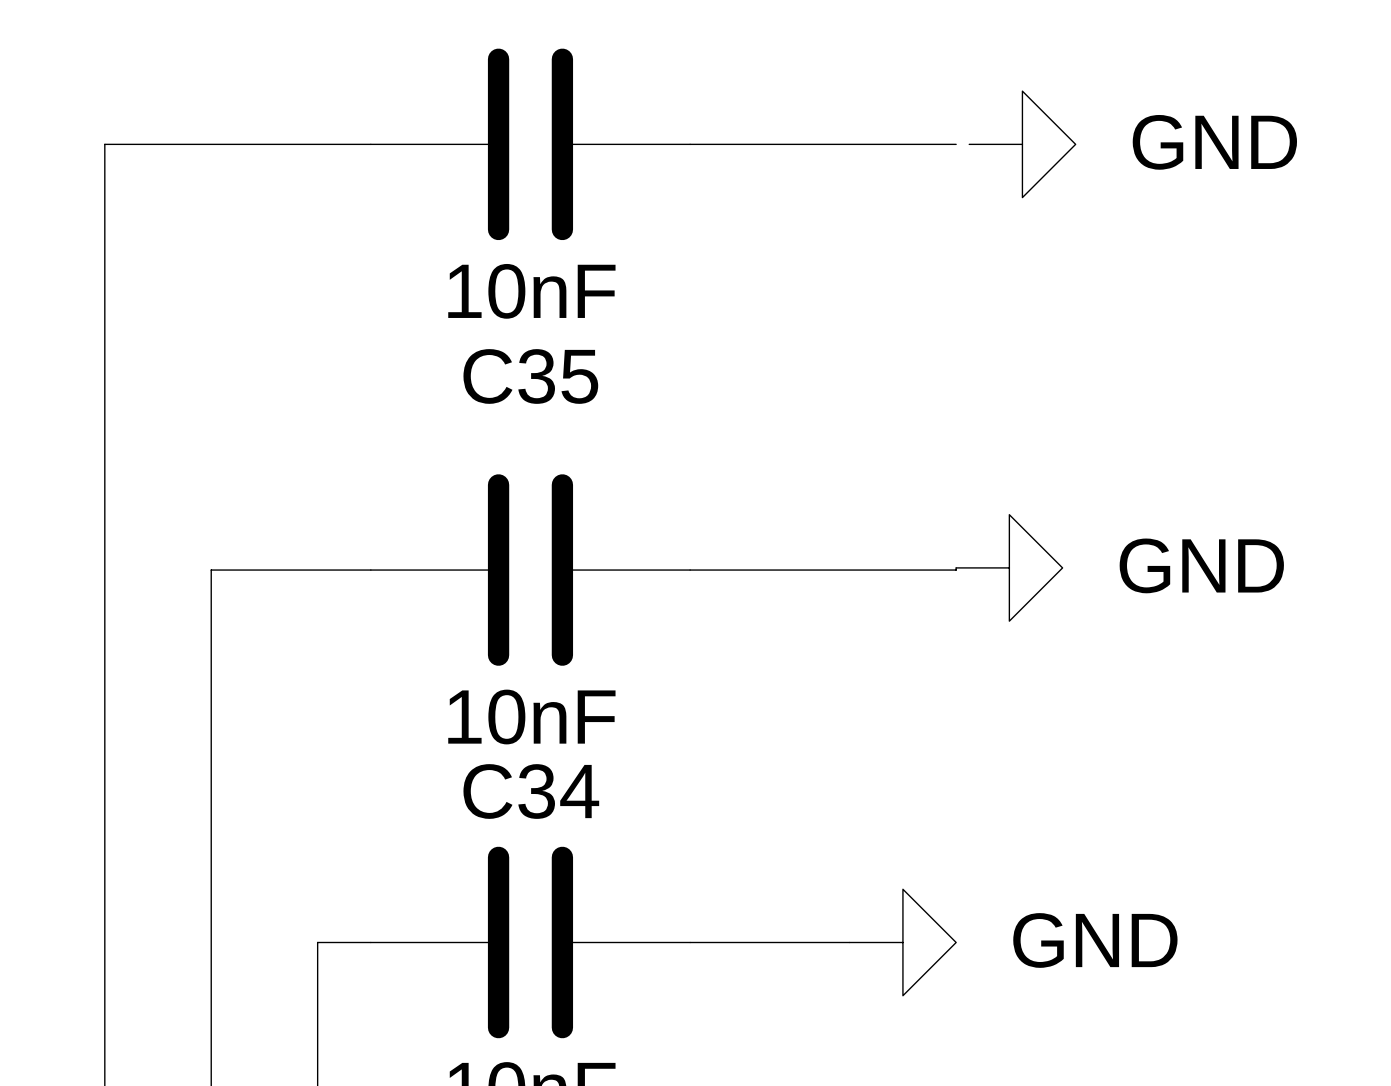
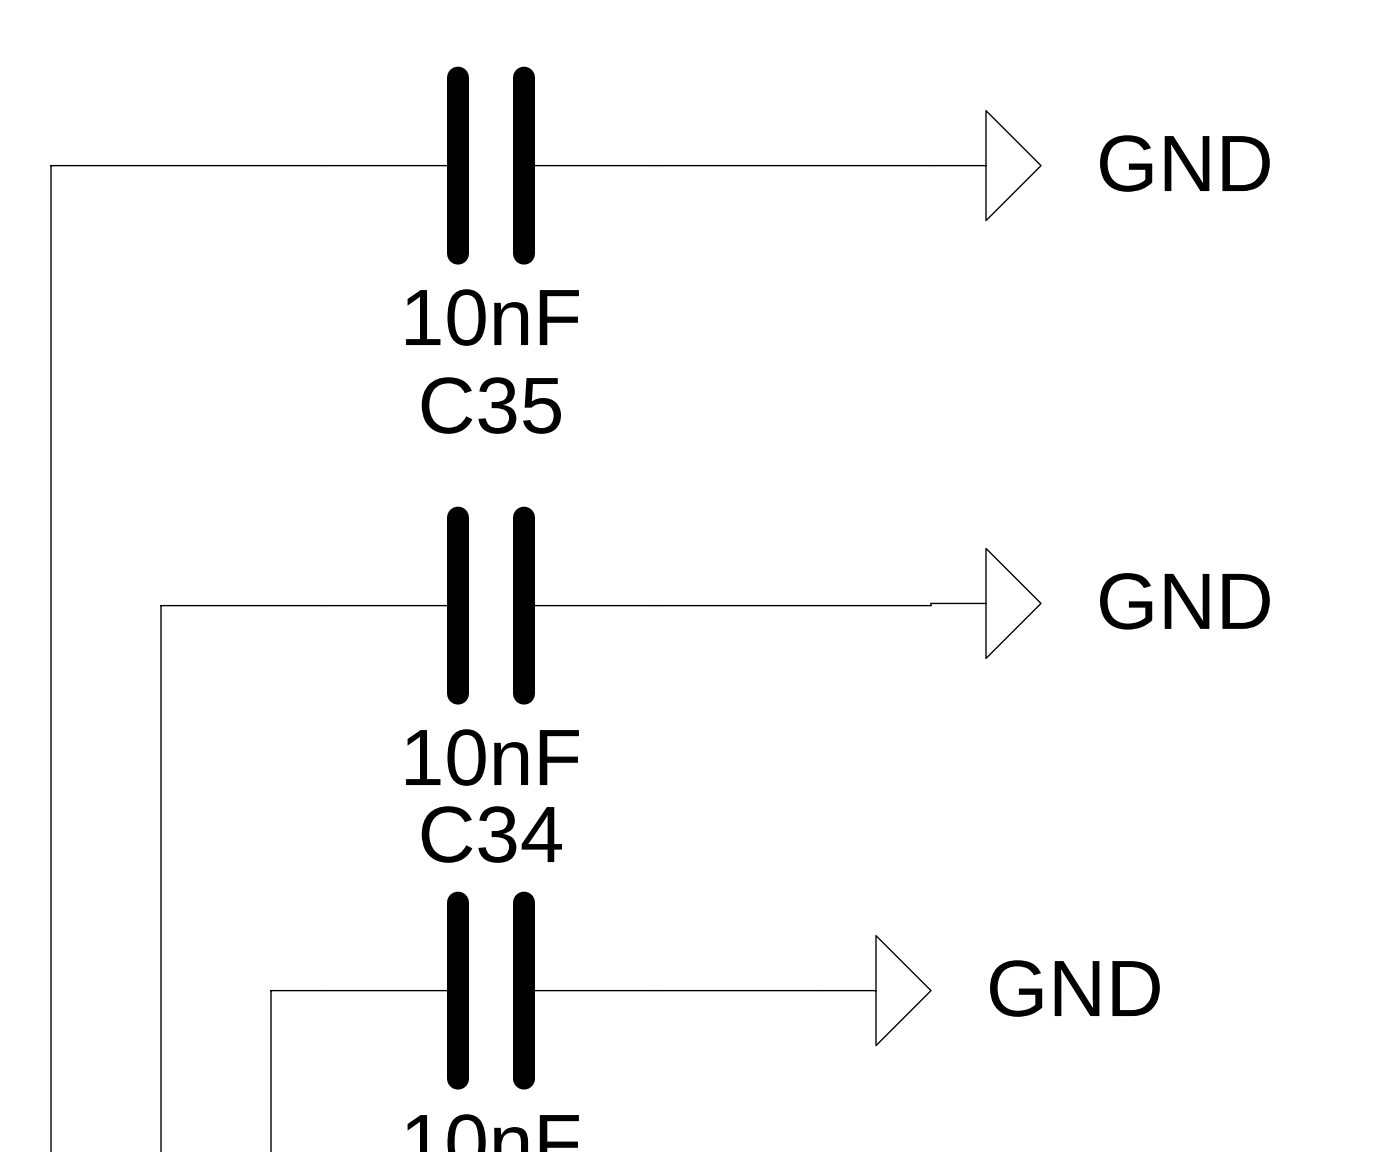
power symbol position: GND (1022, 144) -> GND (985, 165)

